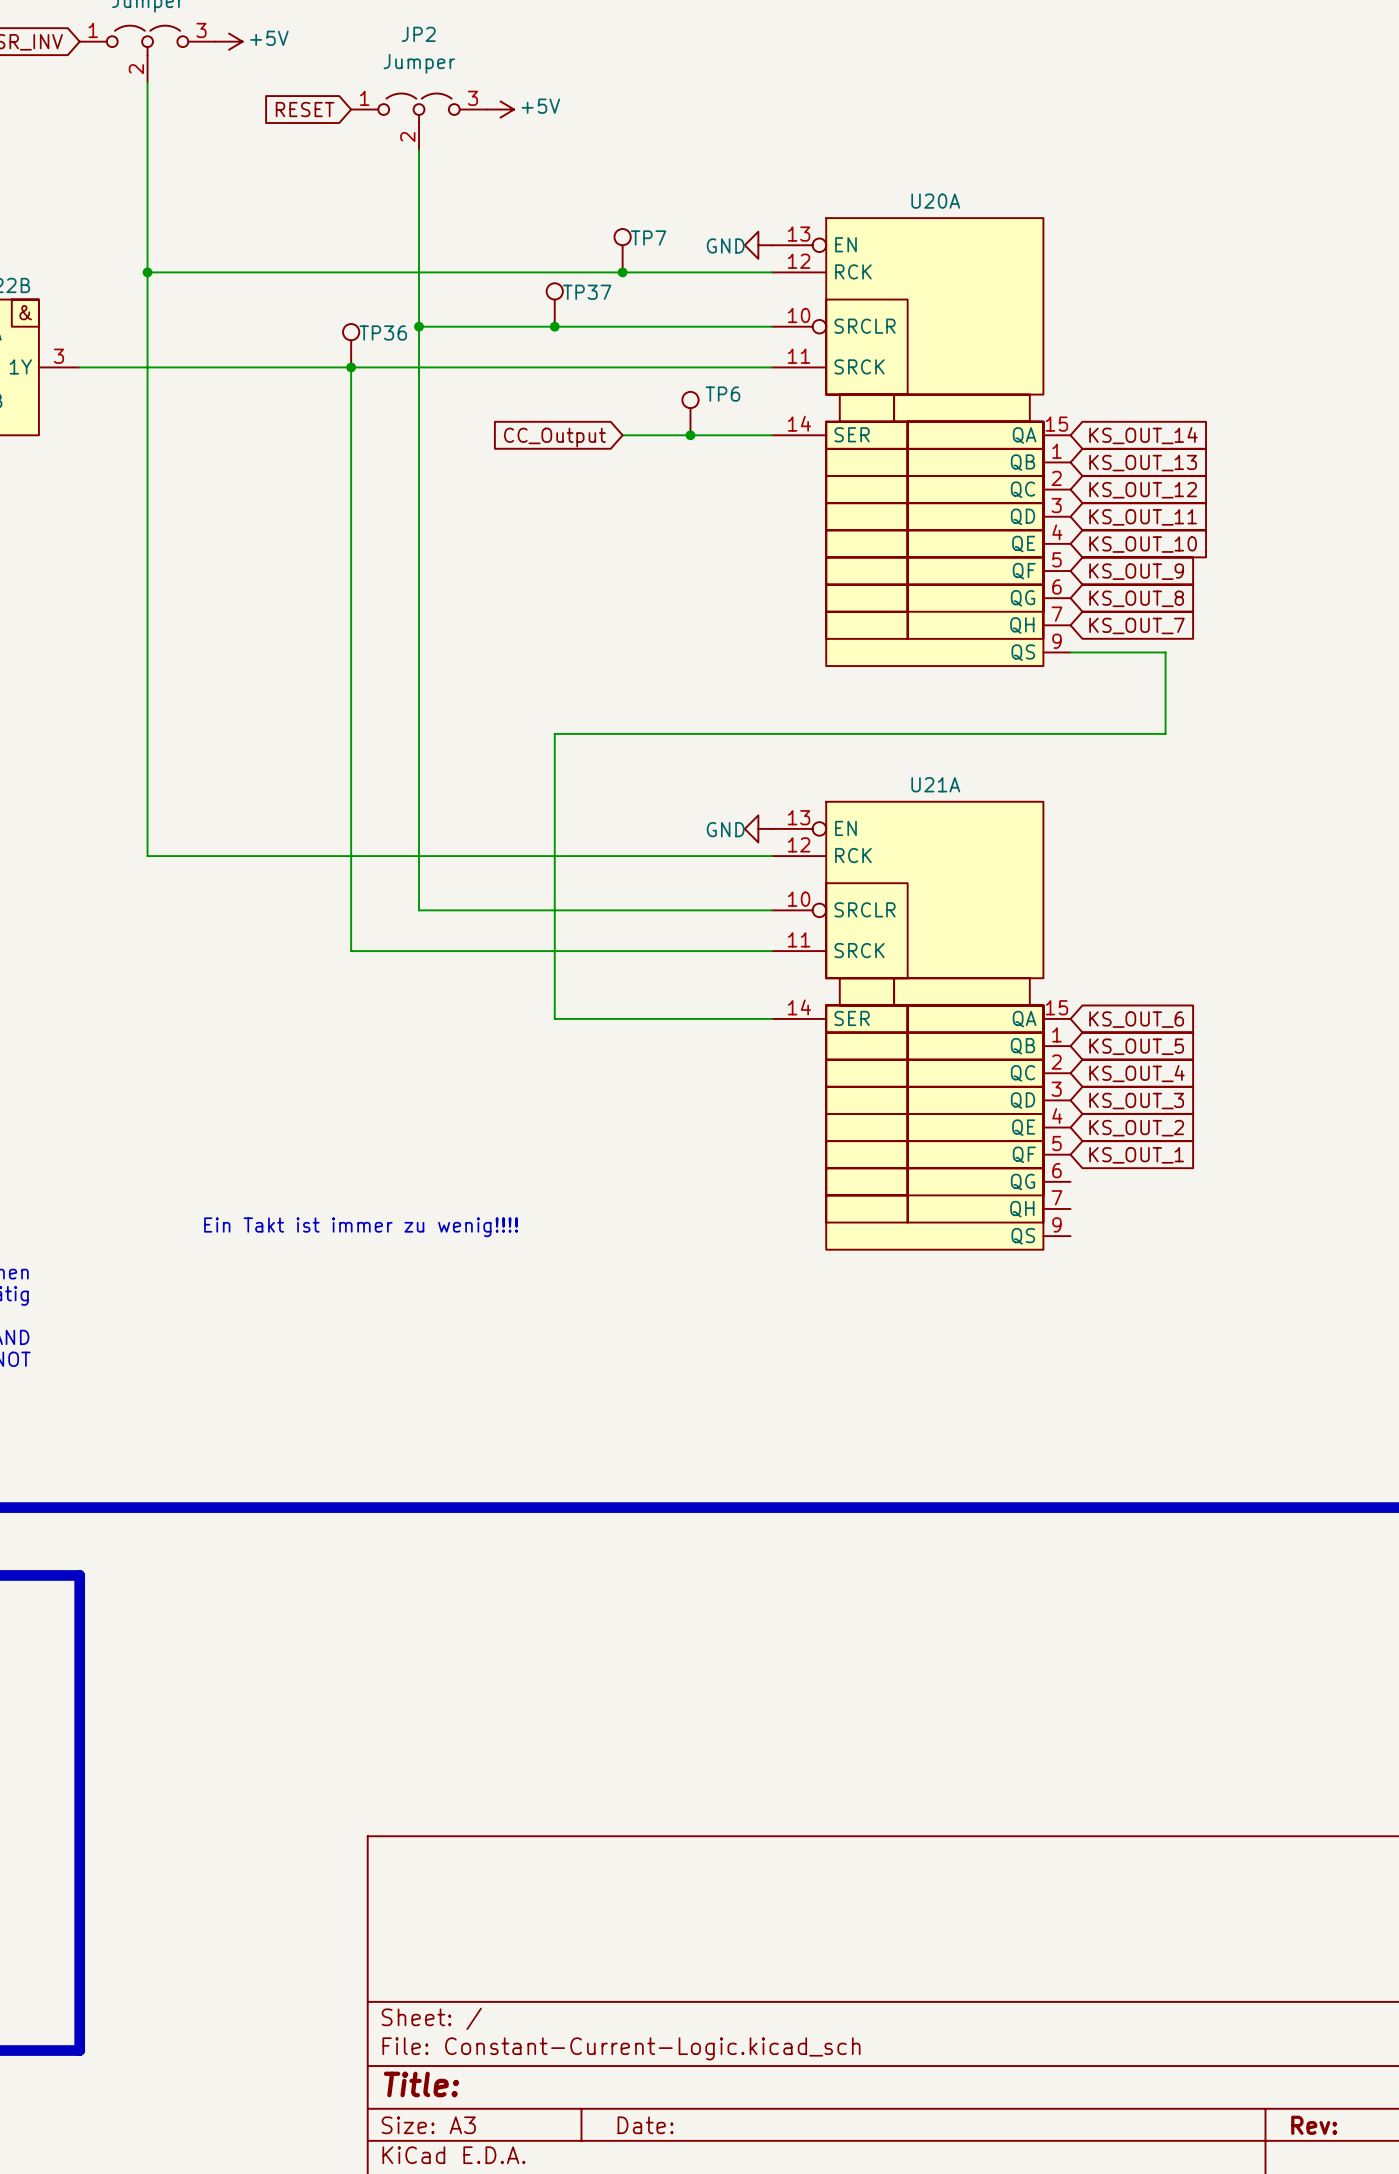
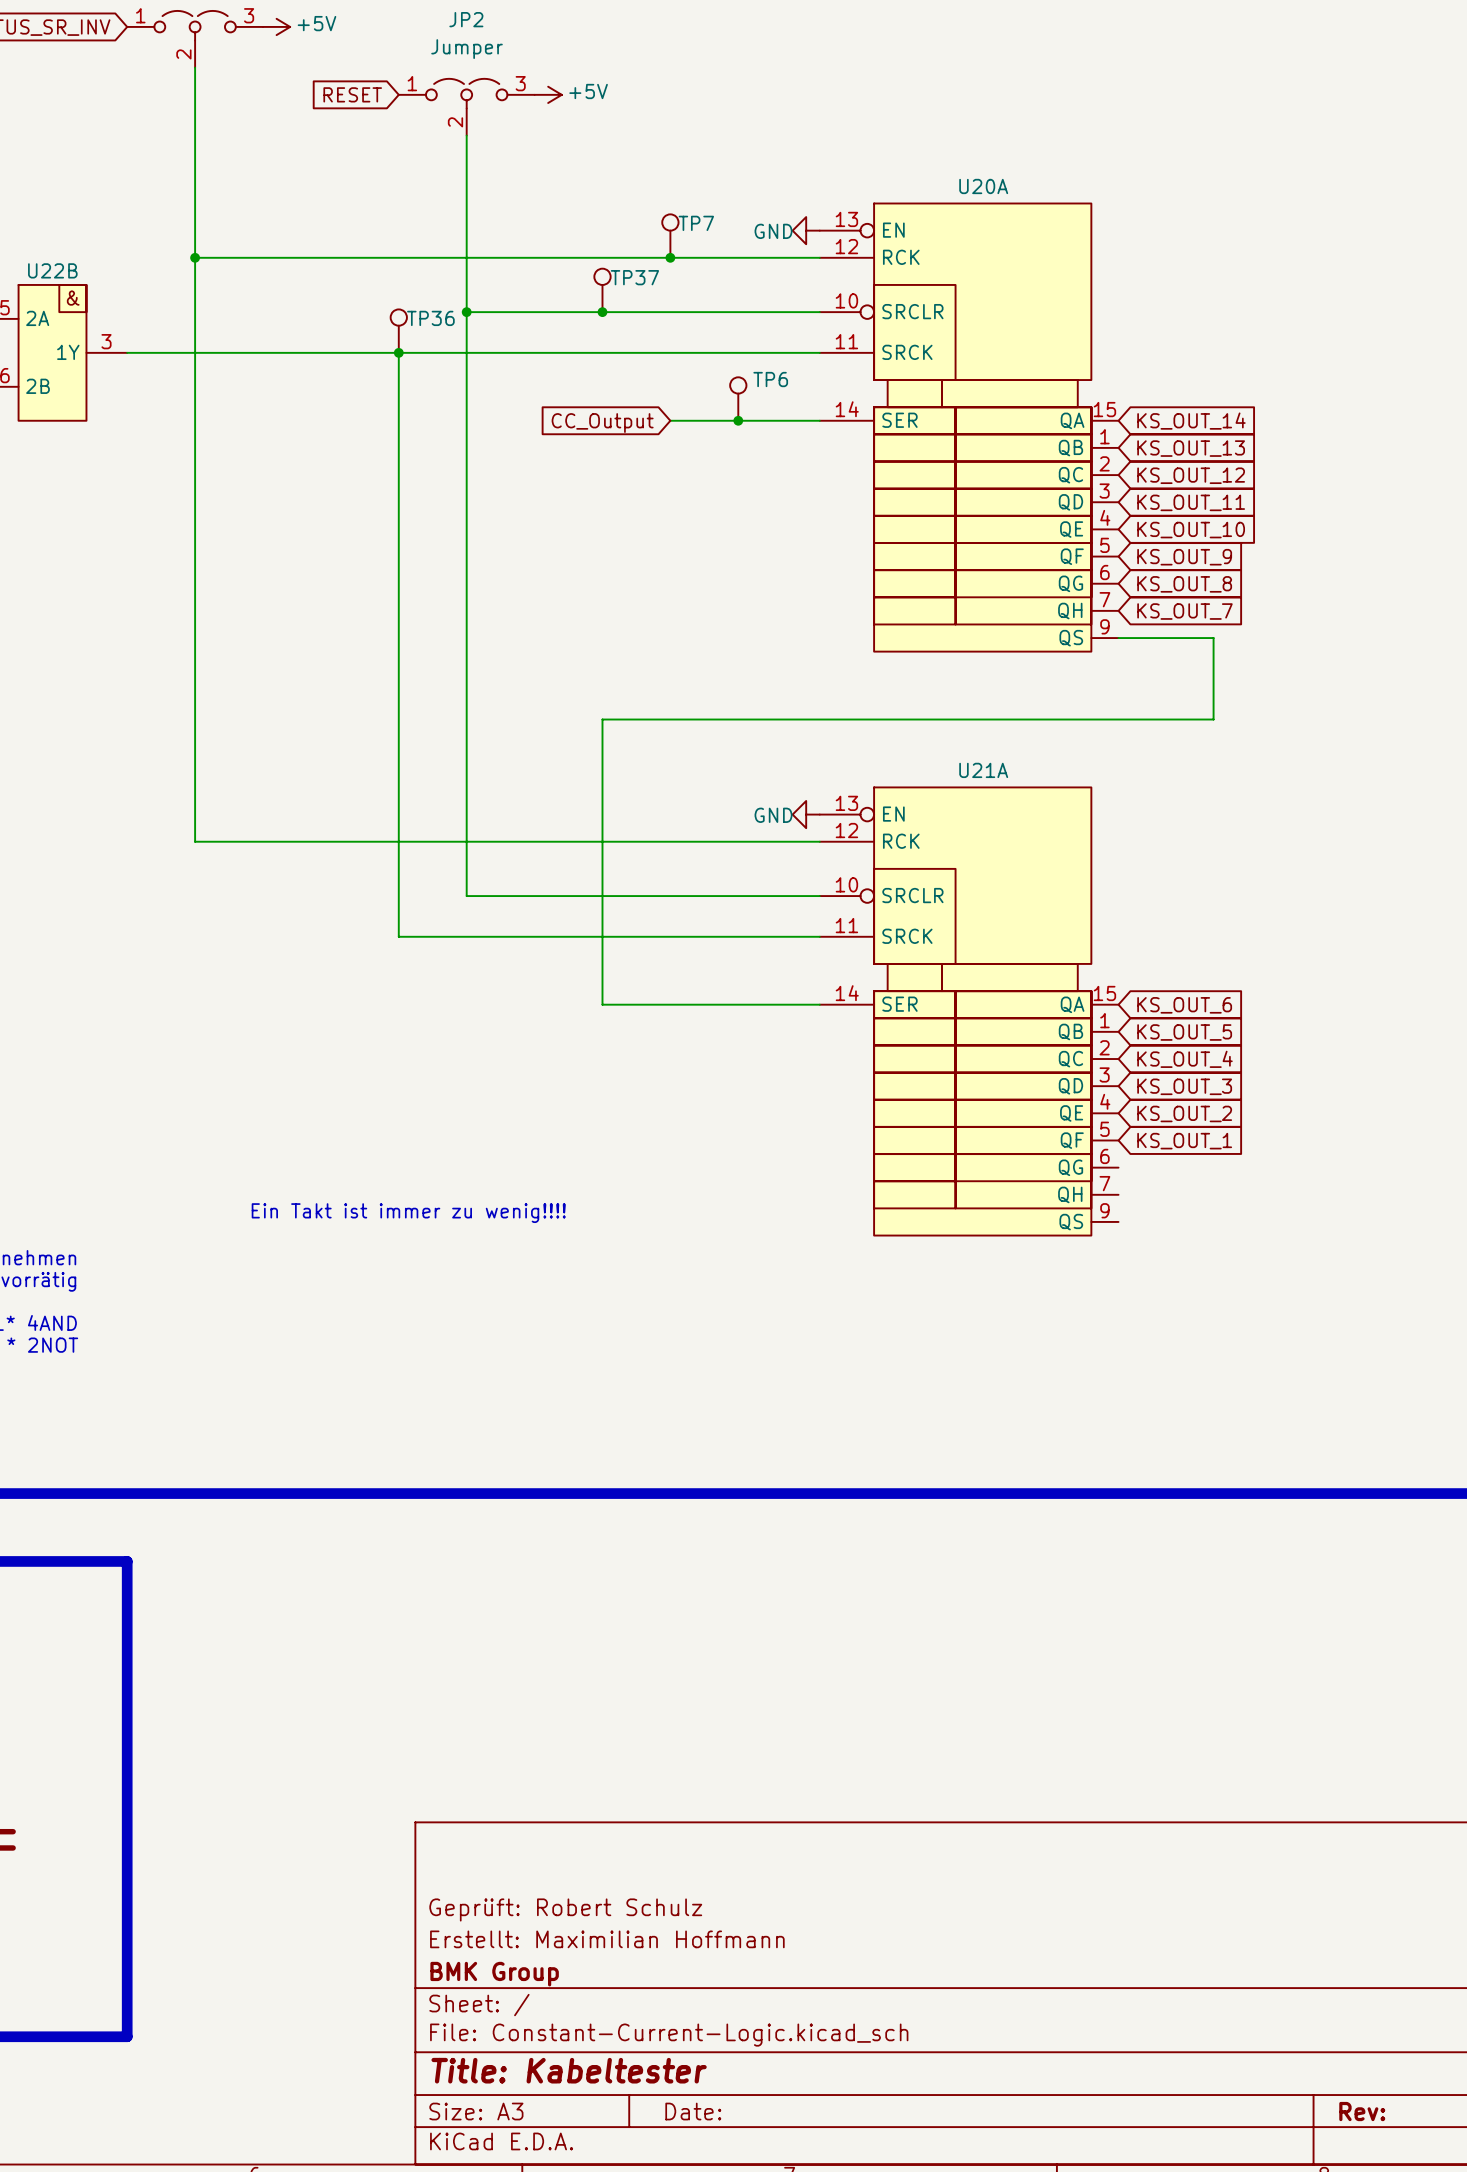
title block: none -> Geprüft: Robert Schulz (565, 1909)
title block: none -> Erstellt: Maximilian Hoffmann (607, 1939)
title block: none -> BMK Group (494, 1974)
title block: Title: (421, 2084) -> Title: Kabeltester (569, 2070)

